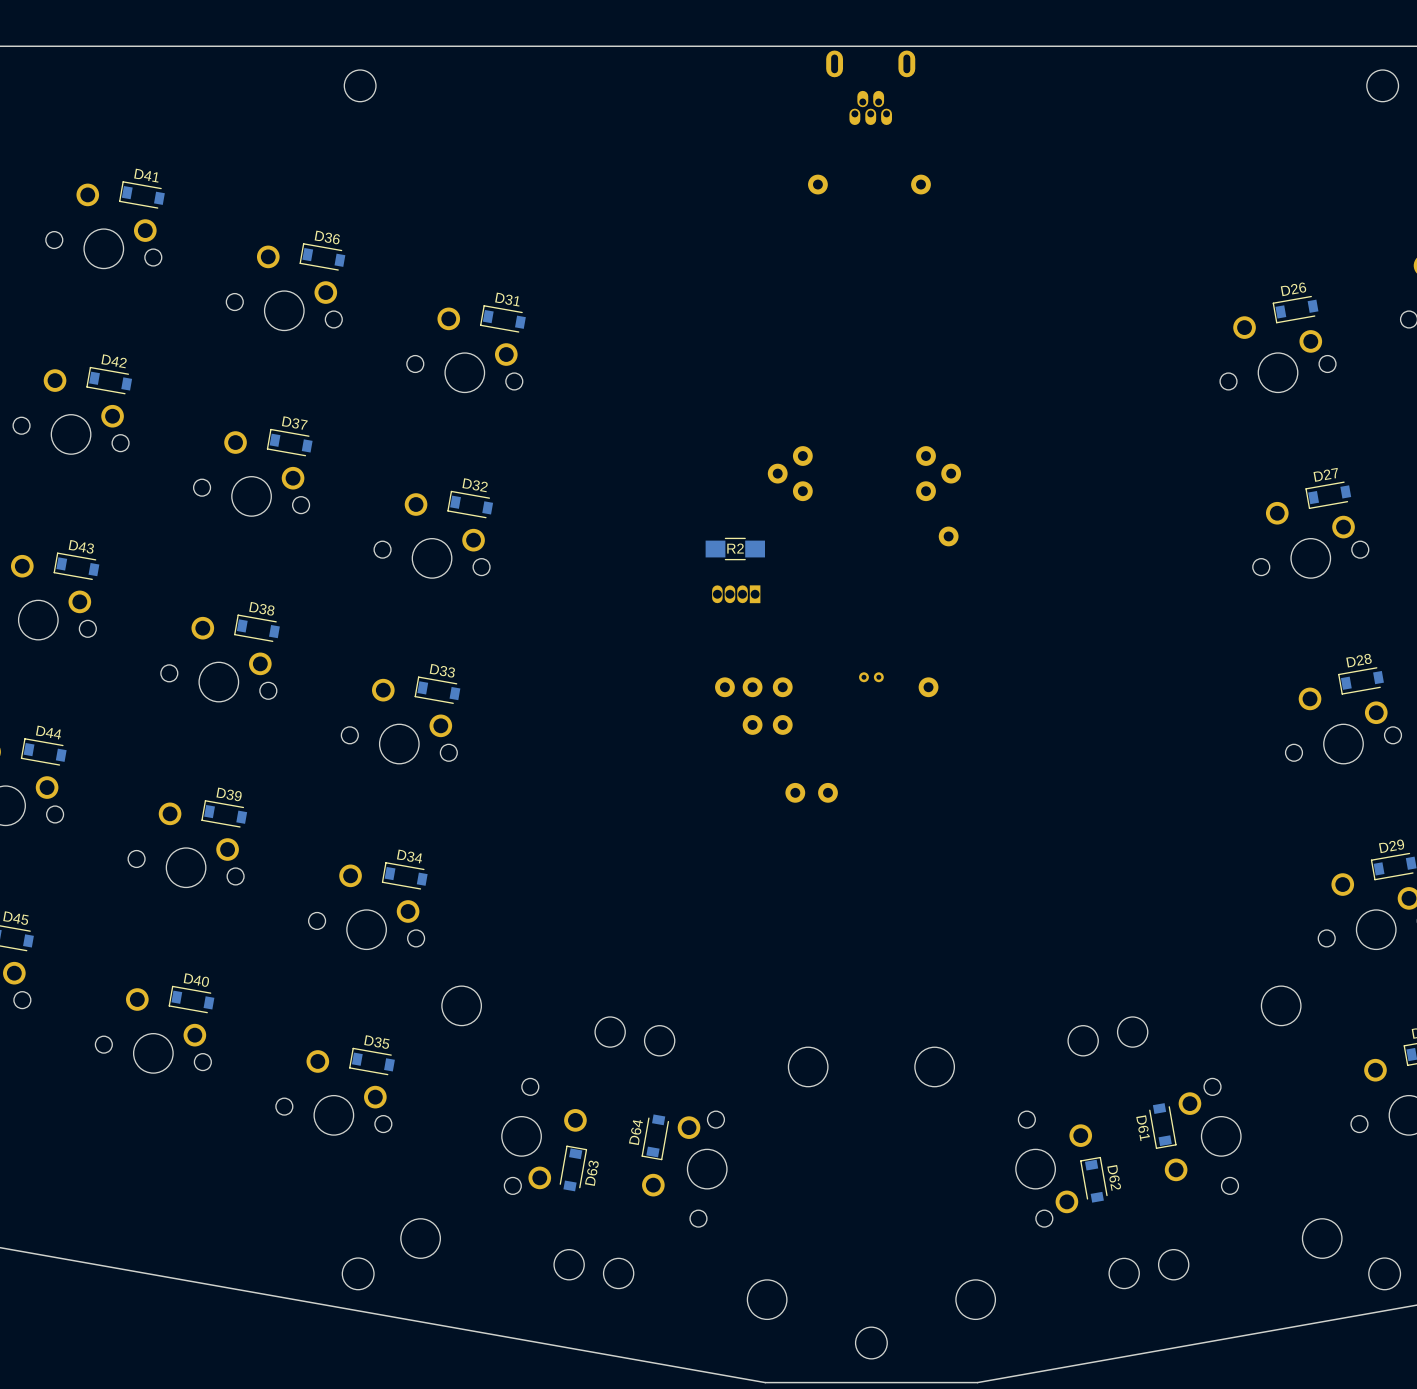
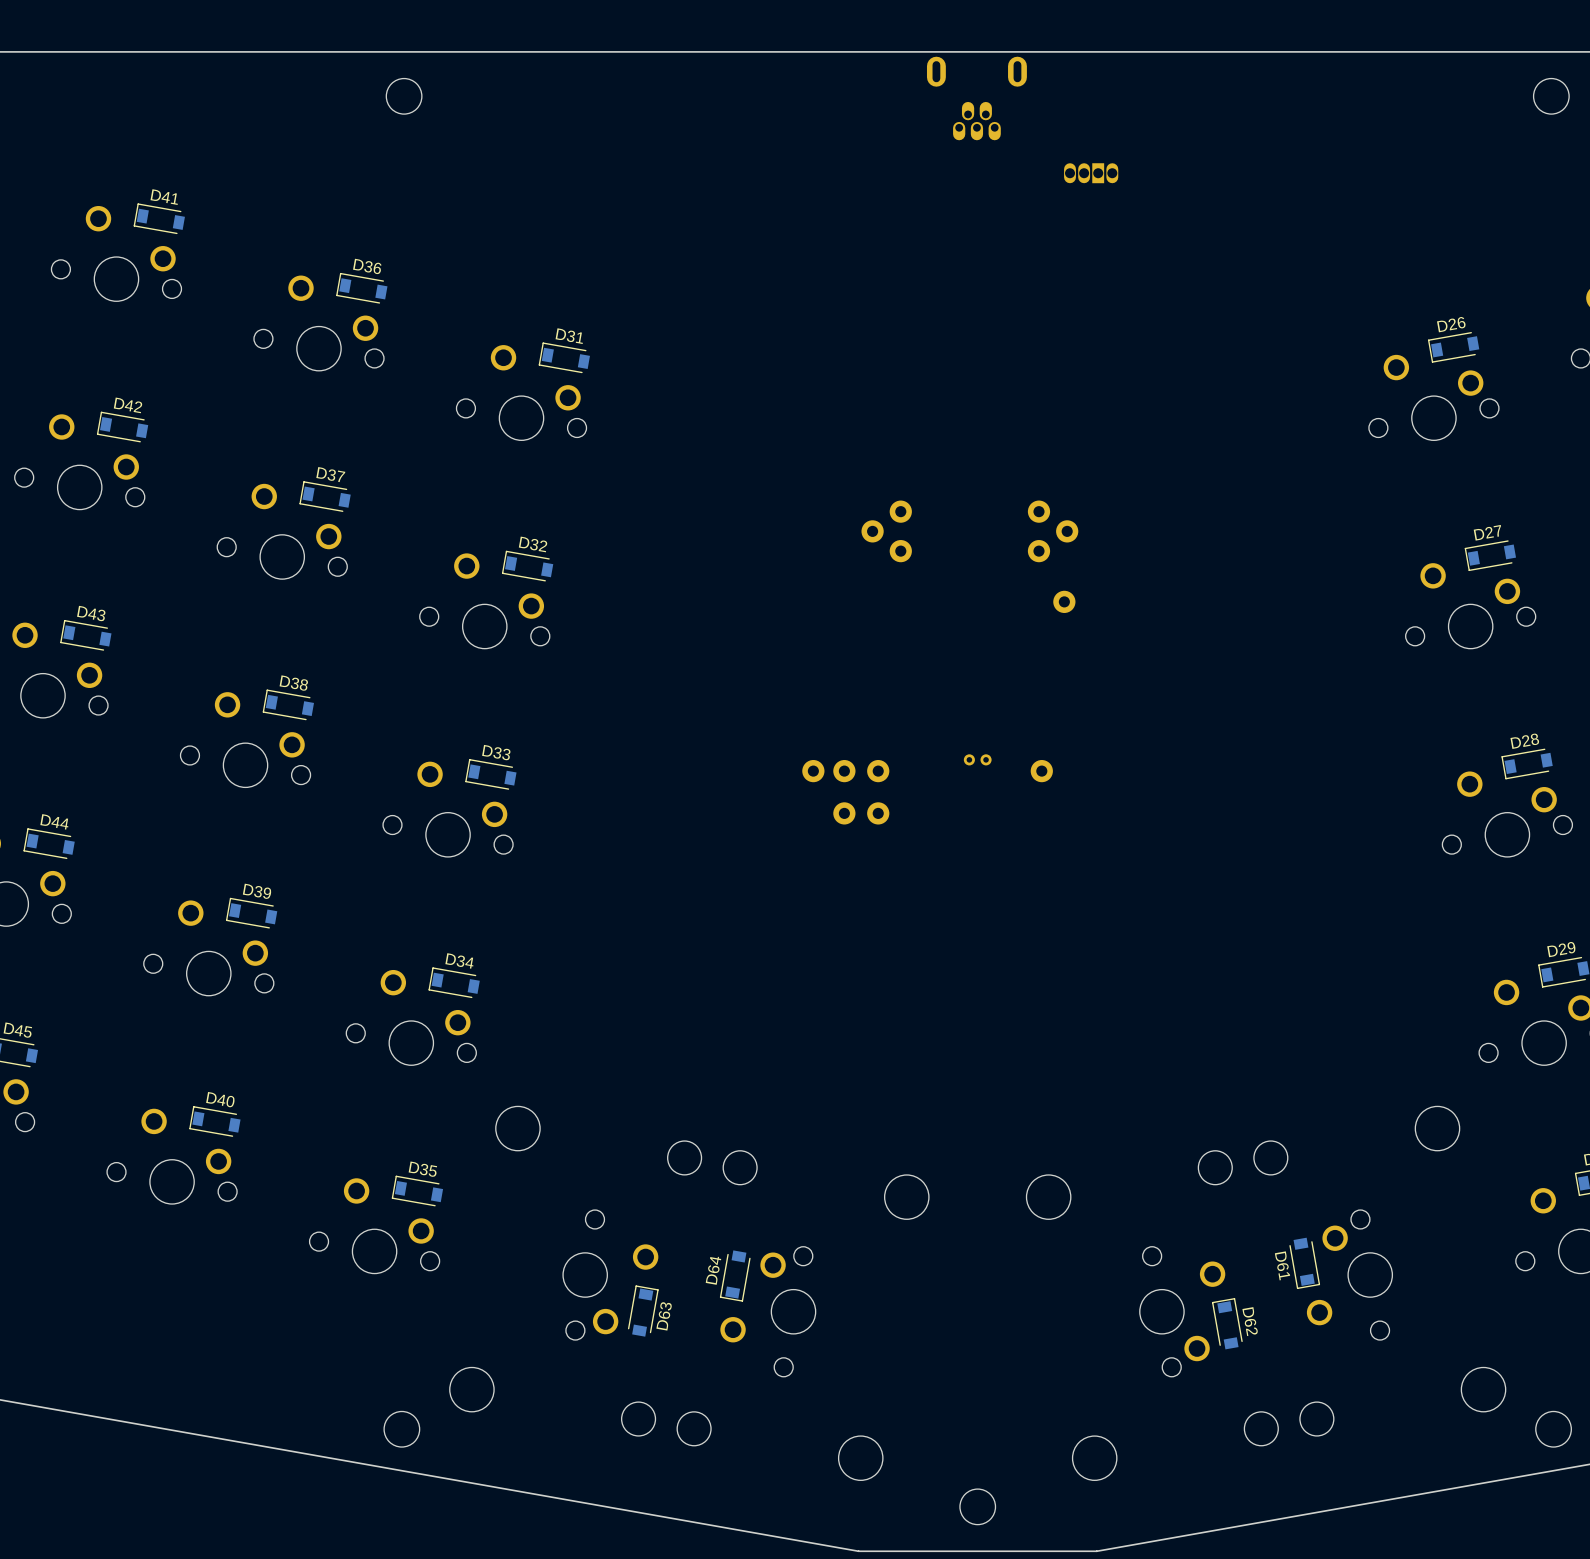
part: none -> (1091, 173)
part: (817, 184) -> none
part: (920, 184) -> none
R2: (735, 549) -> none
part: (736, 594) -> none
part: (795, 792) -> none
part: (827, 792) -> none

